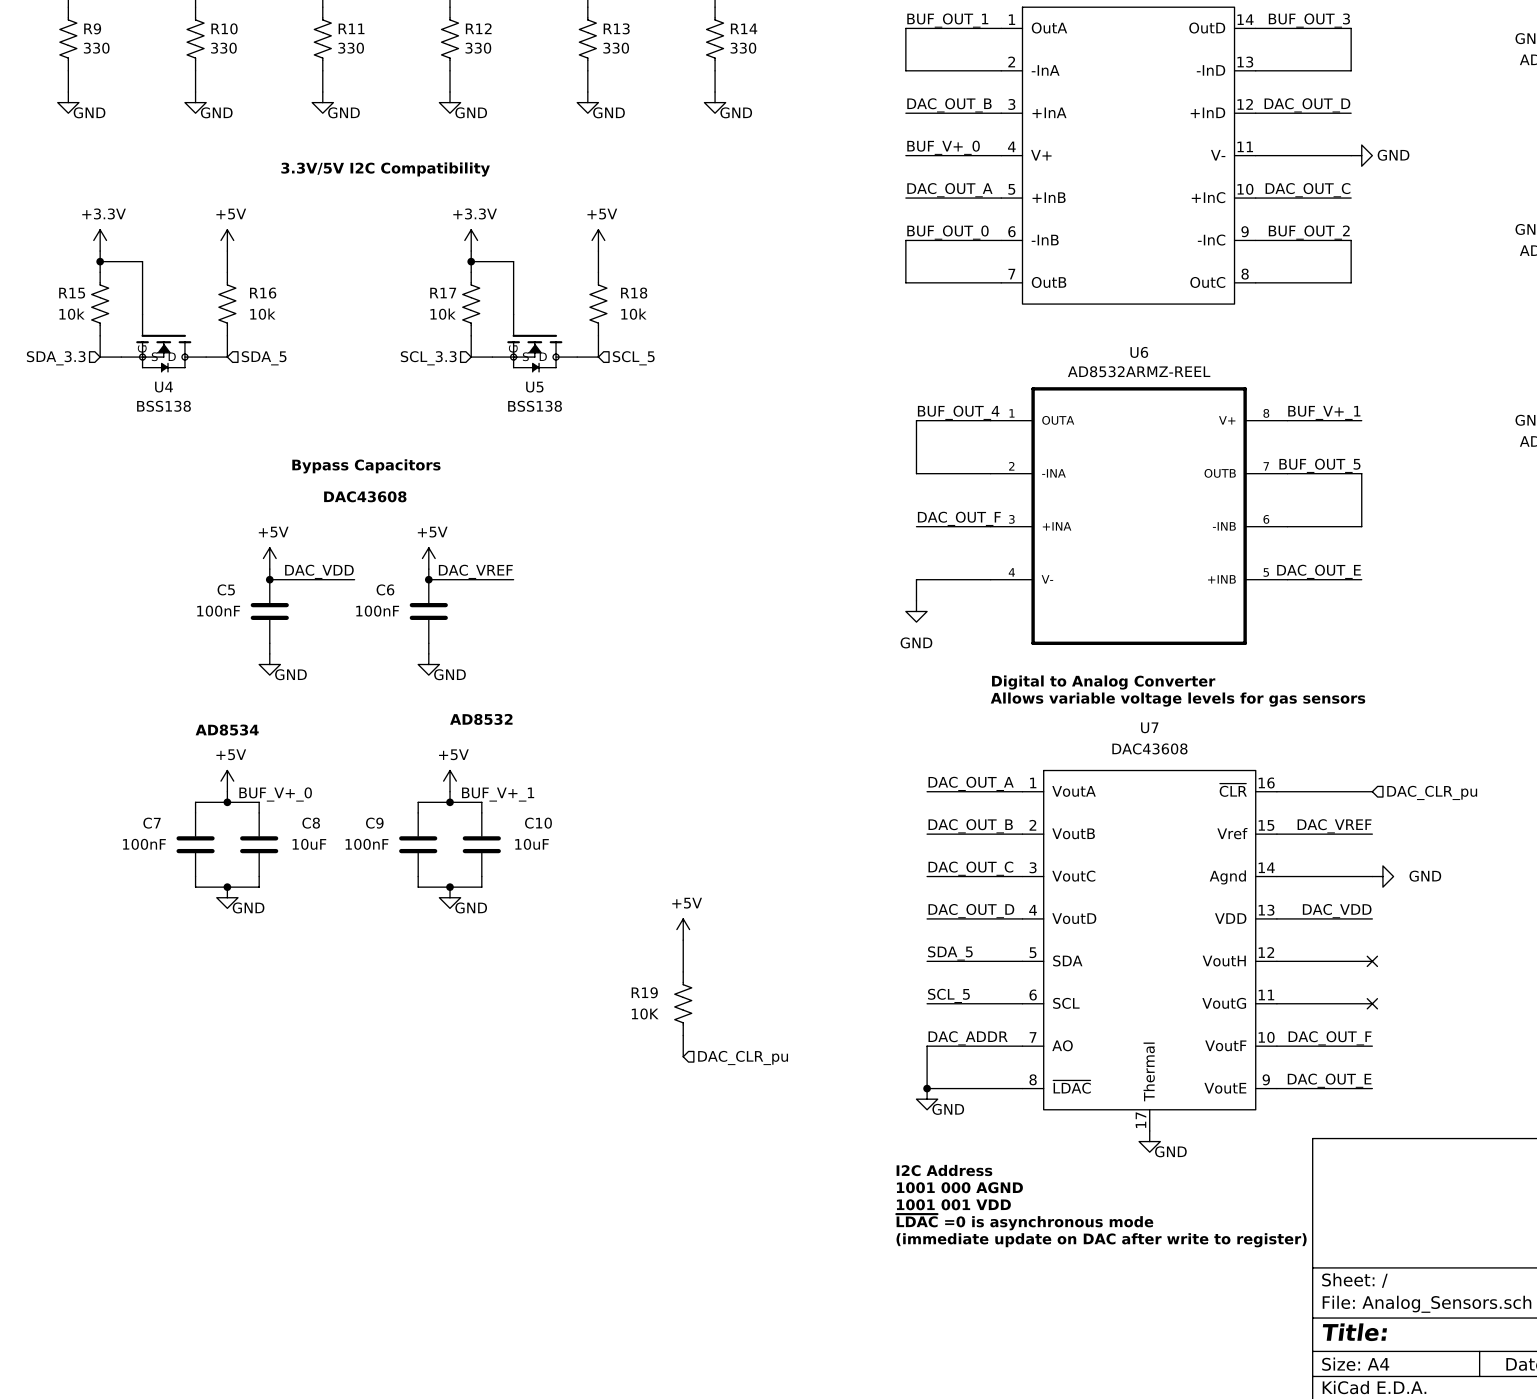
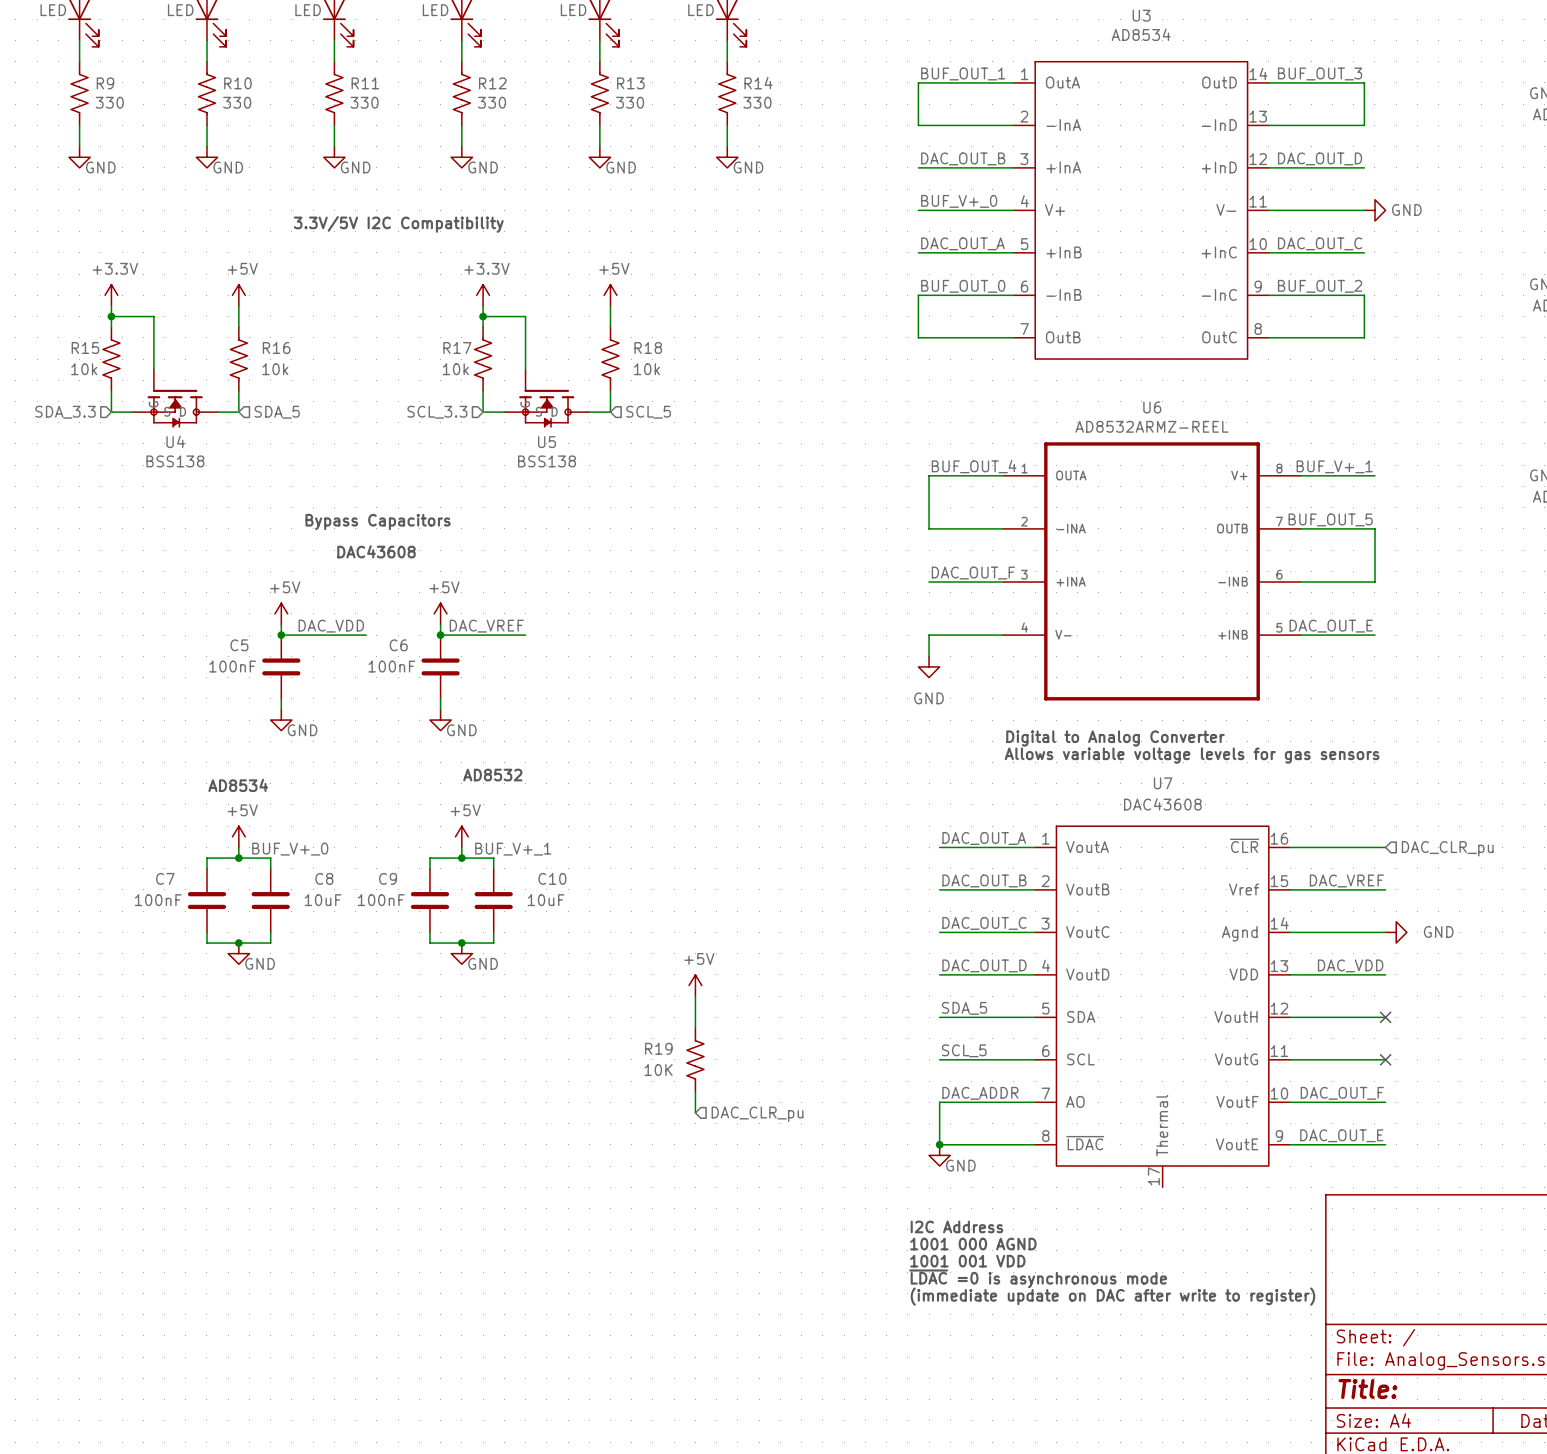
power symbol: GND (1149, 1141) -> none

